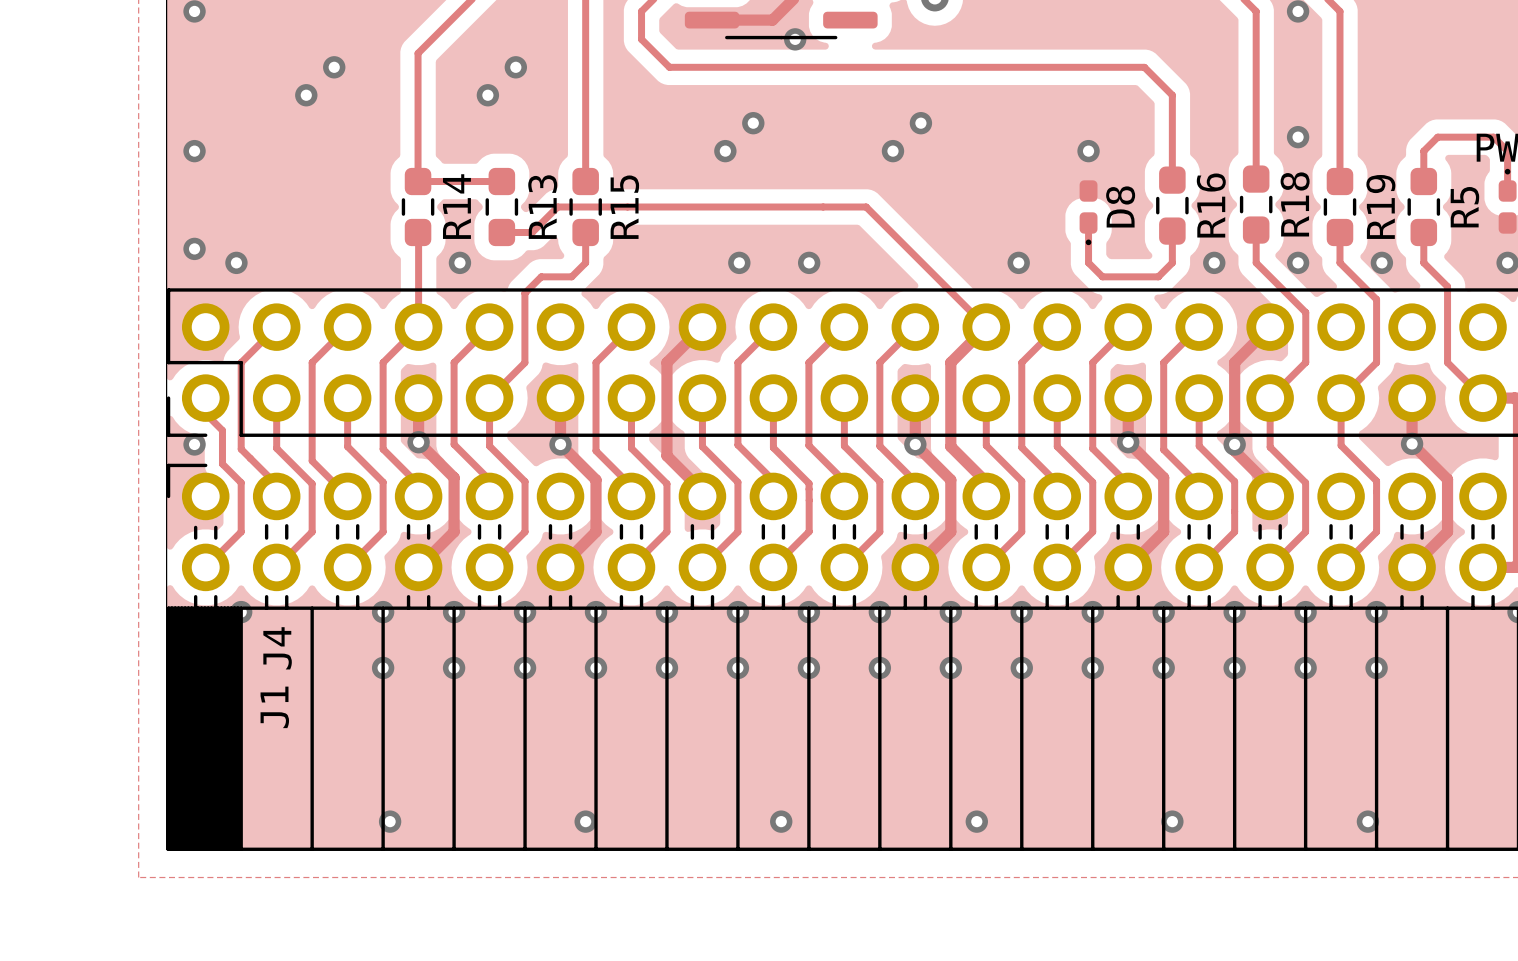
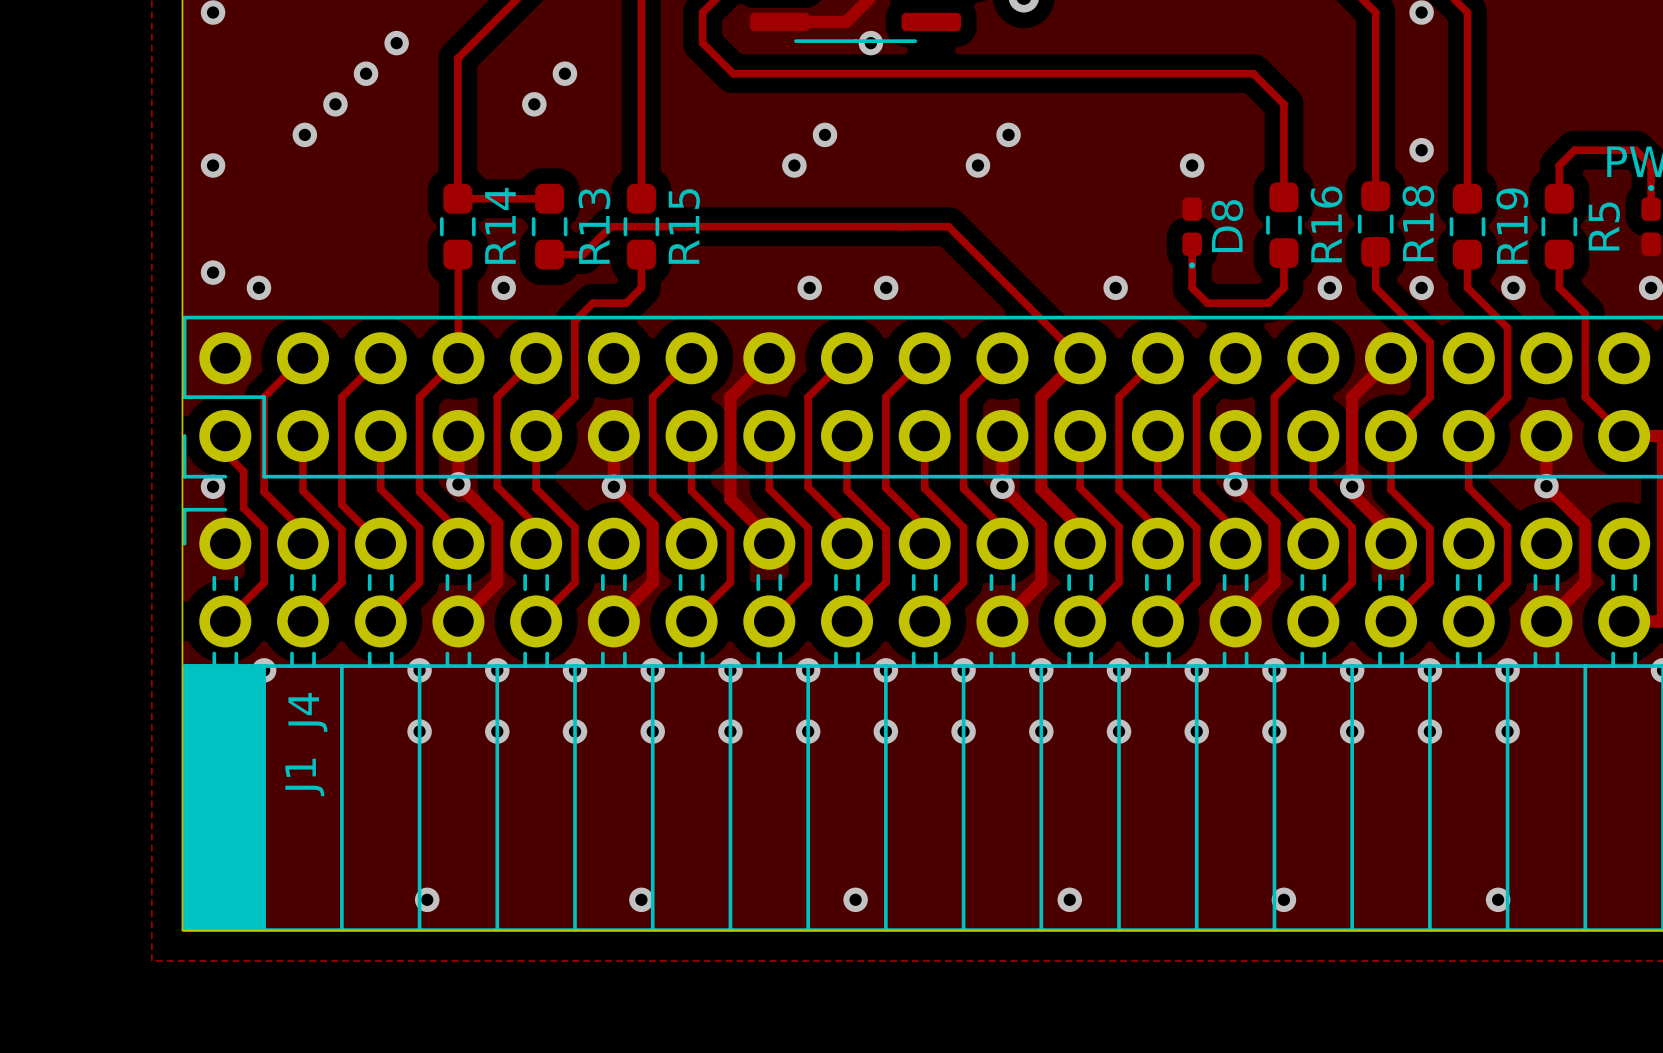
via: none -> (396, 43)
via: none -> (304, 134)

